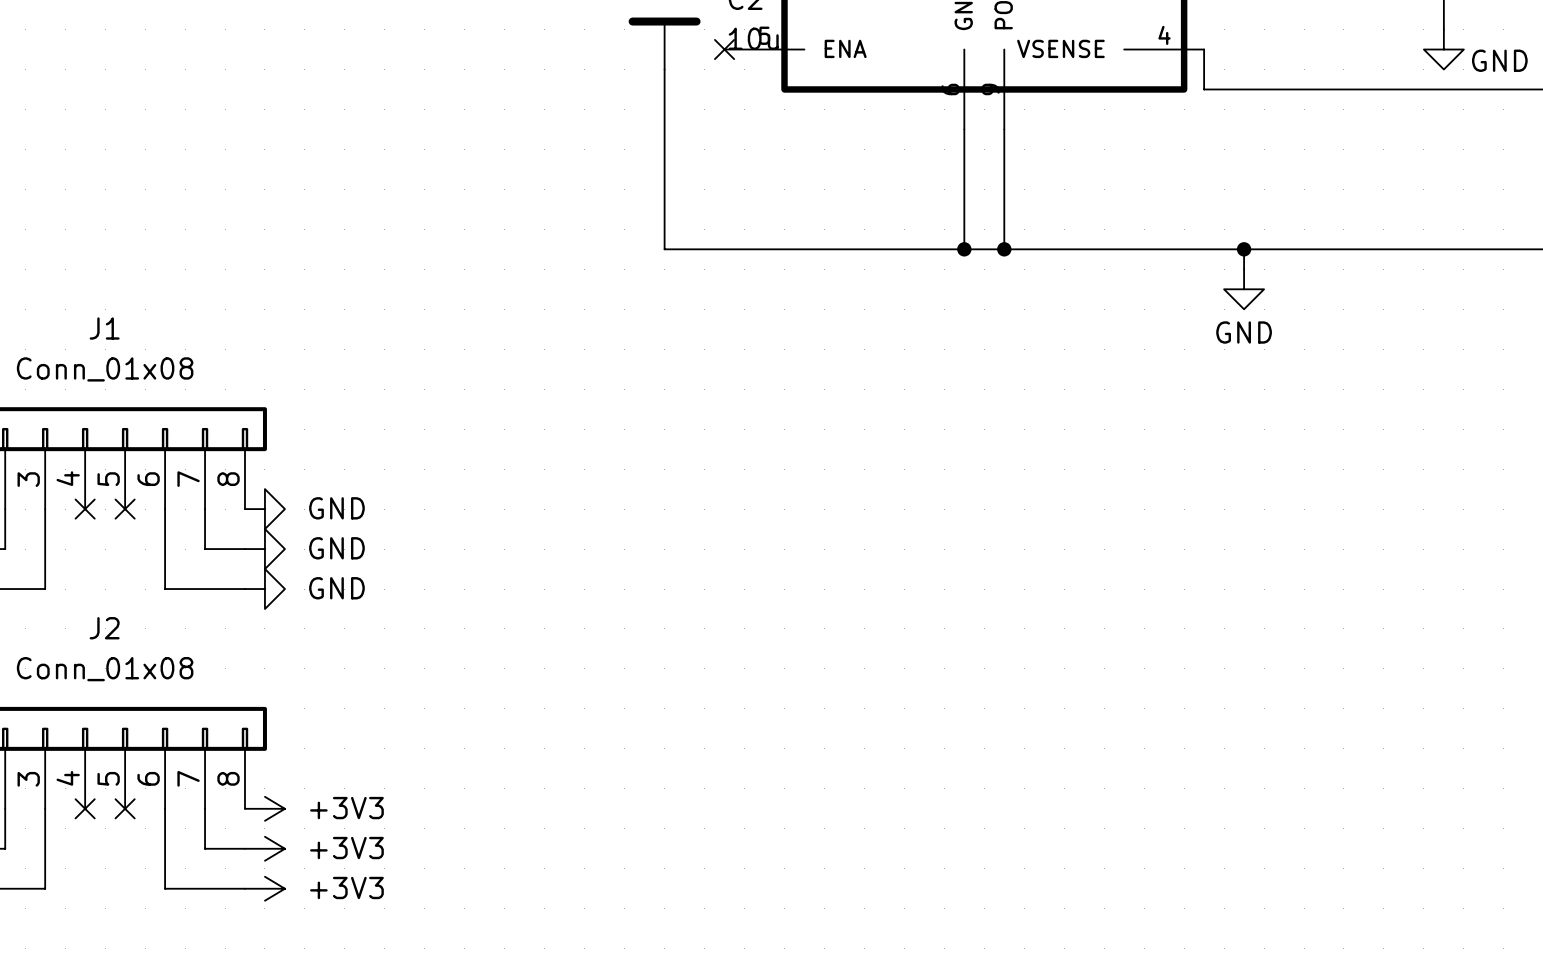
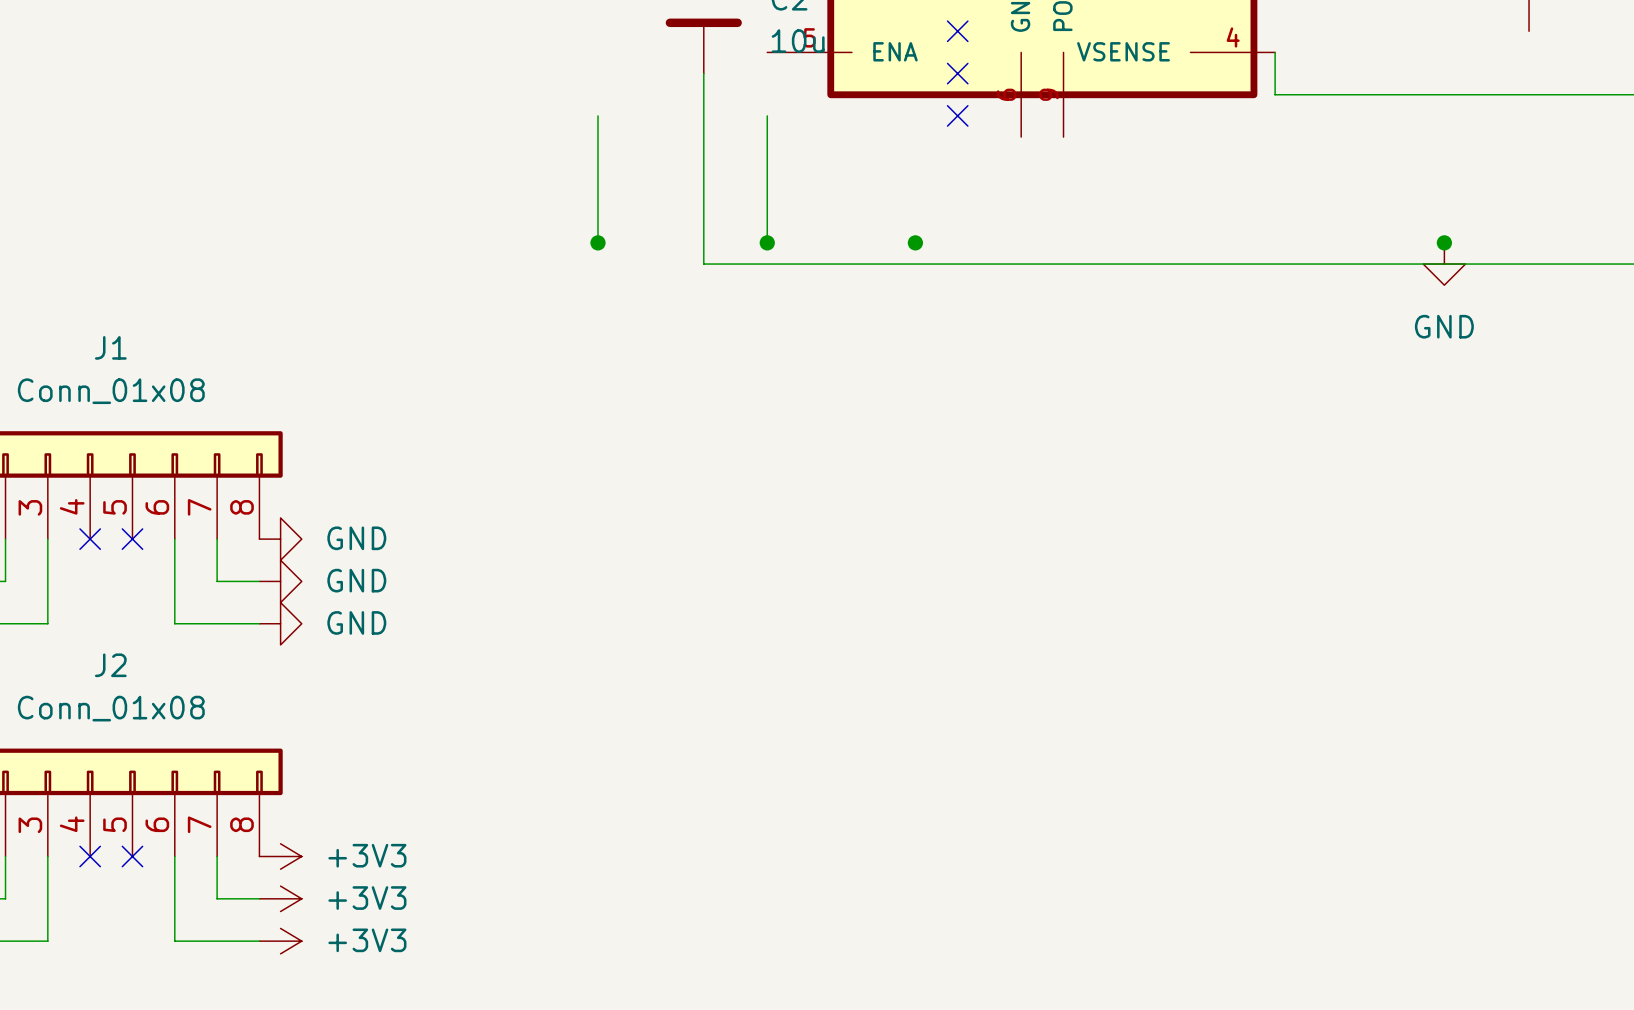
no-connect mark: none -> (957, 31)
no-connect mark: (724, 49) -> none
power symbol: GND (1443, 49) -> none
no-connect mark: none -> (957, 73)
wire: none -> (597, 115) (597, 242)
no-connect mark: none -> (957, 115)
wire: (964, 129) (964, 249) -> (767, 115) (767, 242)
wire: (1004, 129) (1004, 249) -> none
junction: none -> (597, 242)
junction: none -> (767, 242)
junction: none -> (915, 242)
junction: none -> (1444, 242)
junction: (964, 249) -> none
junction: (1004, 249) -> none
wire: (1244, 249) (1244, 269) -> none
junction: (1244, 249) -> none
power symbol: none -> GND (1444, 264)
power symbol: GND (1244, 289) -> none

